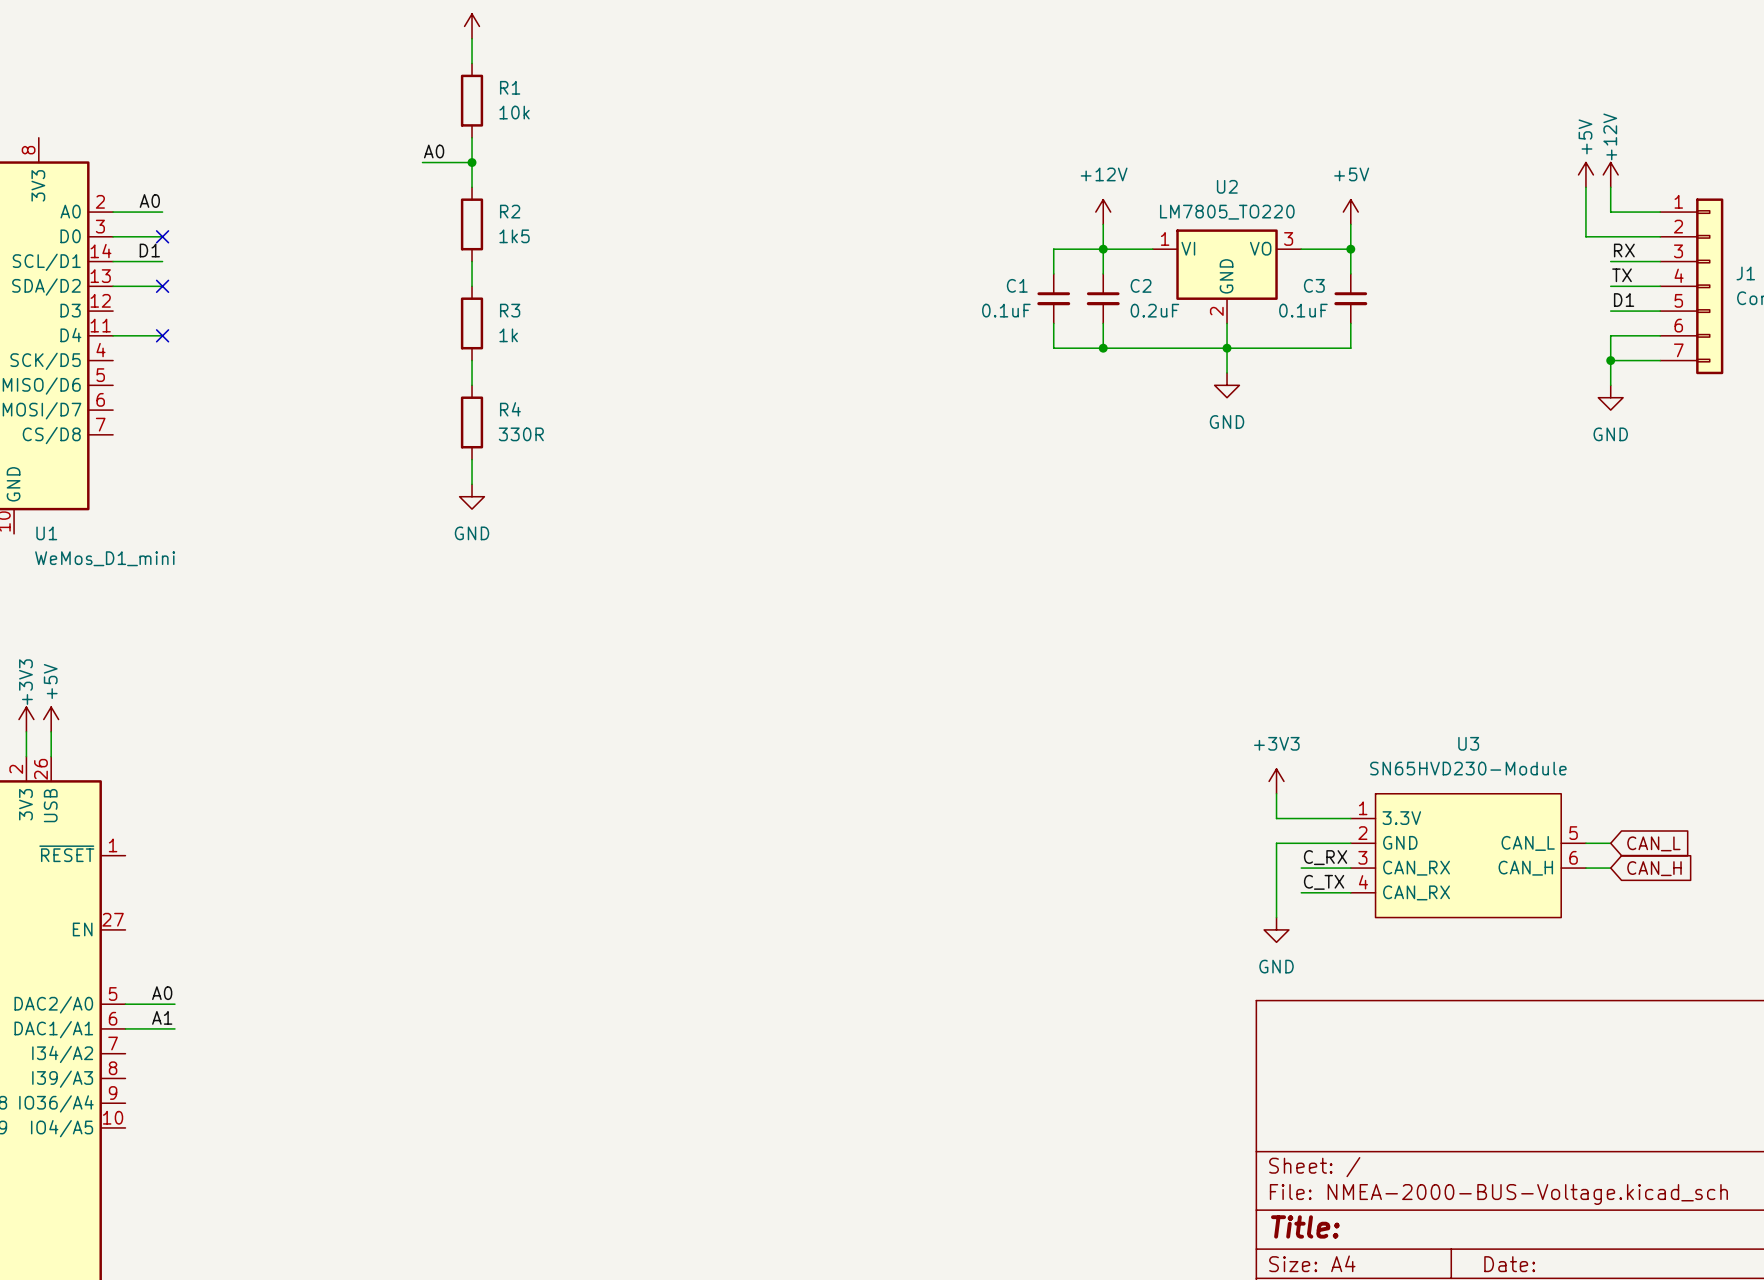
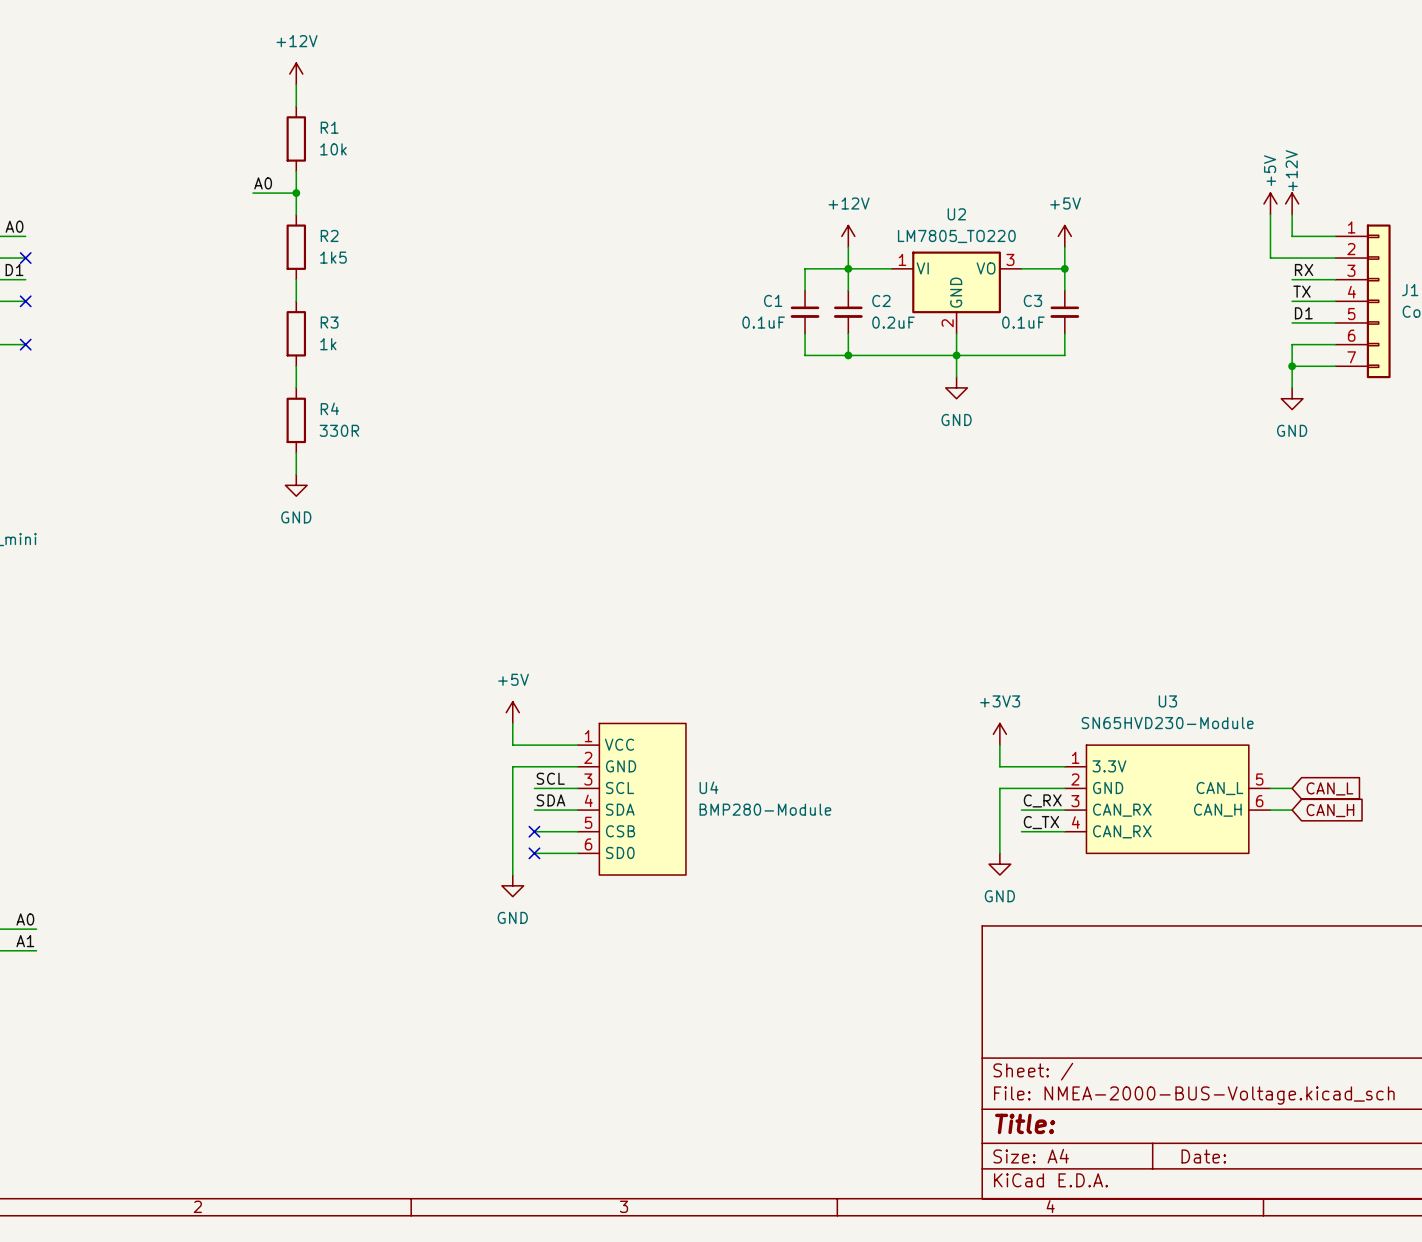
power symbol: none -> +5V (512, 712)
wire: none -> (512, 723) (512, 745) (577, 745)
wire: none -> (577, 766) (512, 766) (512, 875)
label: none -> SCL (550, 778)
wire: none -> (534, 788) (577, 788)
U4: none -> BMP280-Module (631, 799)
label: none -> SDA (551, 800)
wire: none -> (534, 810) (577, 810)
wire: none -> (534, 831) (577, 831)
no-connect mark: none -> (534, 831)
wire: none -> (534, 853) (577, 853)
no-connect mark: none -> (534, 853)
power symbol: none -> GND (512, 885)

